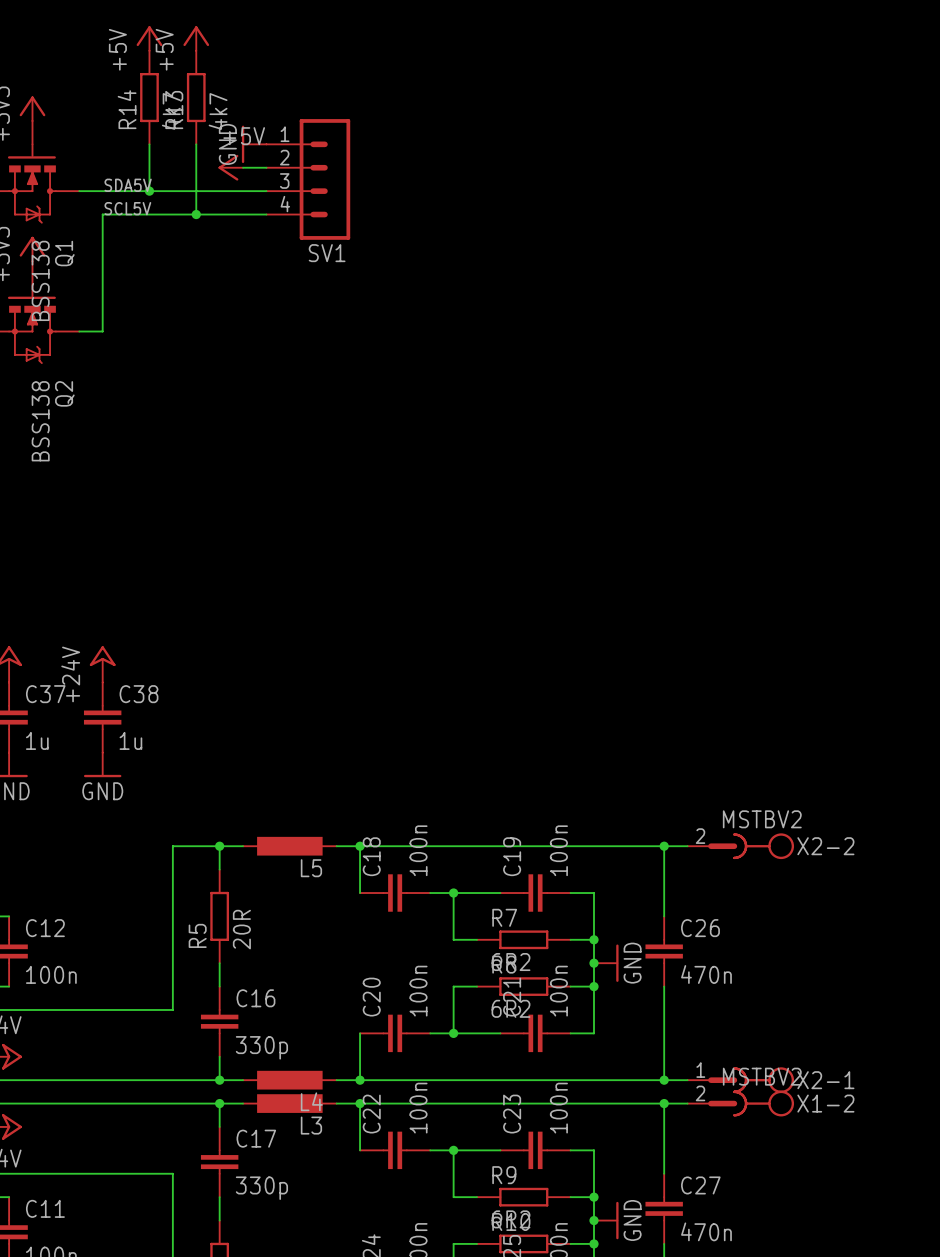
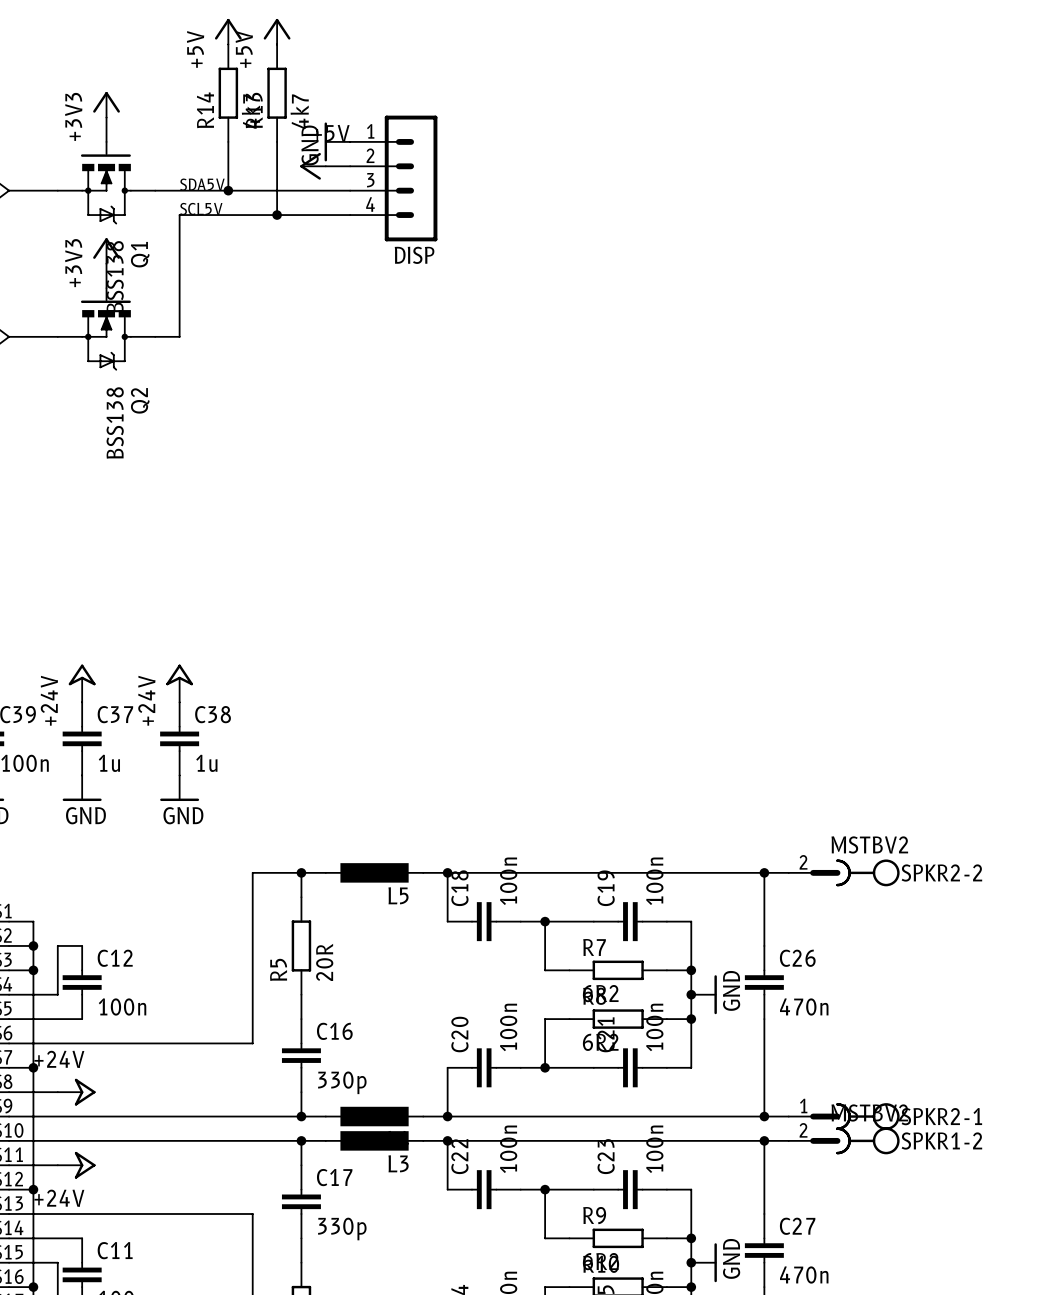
SV1 name: SV1 (327, 253) -> DISP (414, 255)
X2-2 name: X2-2 (825, 846) -> SPKR2-2 (941, 872)
X2-1 name: X2-1 (825, 1080) -> SPKR2-1 (941, 1116)
X1-2 name: X1-2 (825, 1103) -> SPKR1-2 (941, 1140)

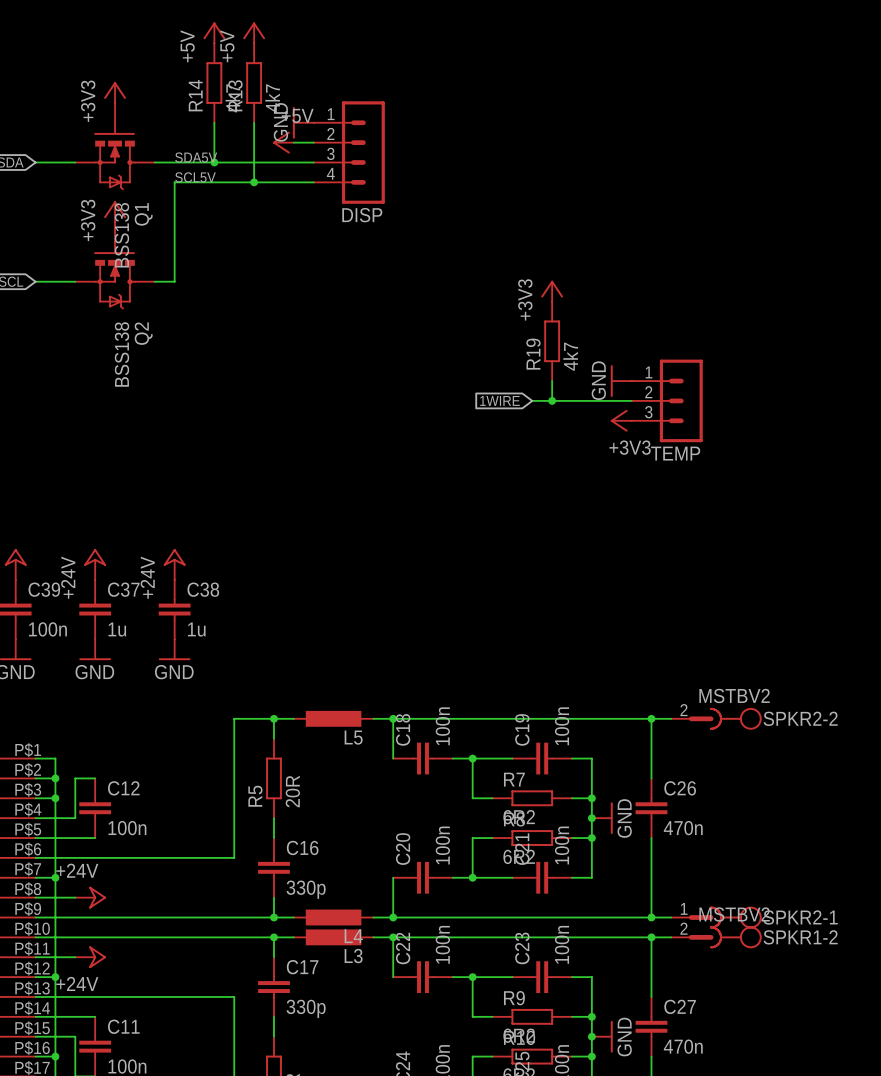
power symbol: none -> +3V3 (552, 291)
R19: none -> 4k7 (552, 341)
wire: none -> (552, 381) (552, 400)
power symbol: none -> GND (621, 381)
global label: none -> 1WIRE (499, 400)
wire: none -> (532, 400) (631, 400)
junction: none -> (552, 400)
TEMP: none -> (667, 400)
power symbol: none -> +3V3 (621, 420)

